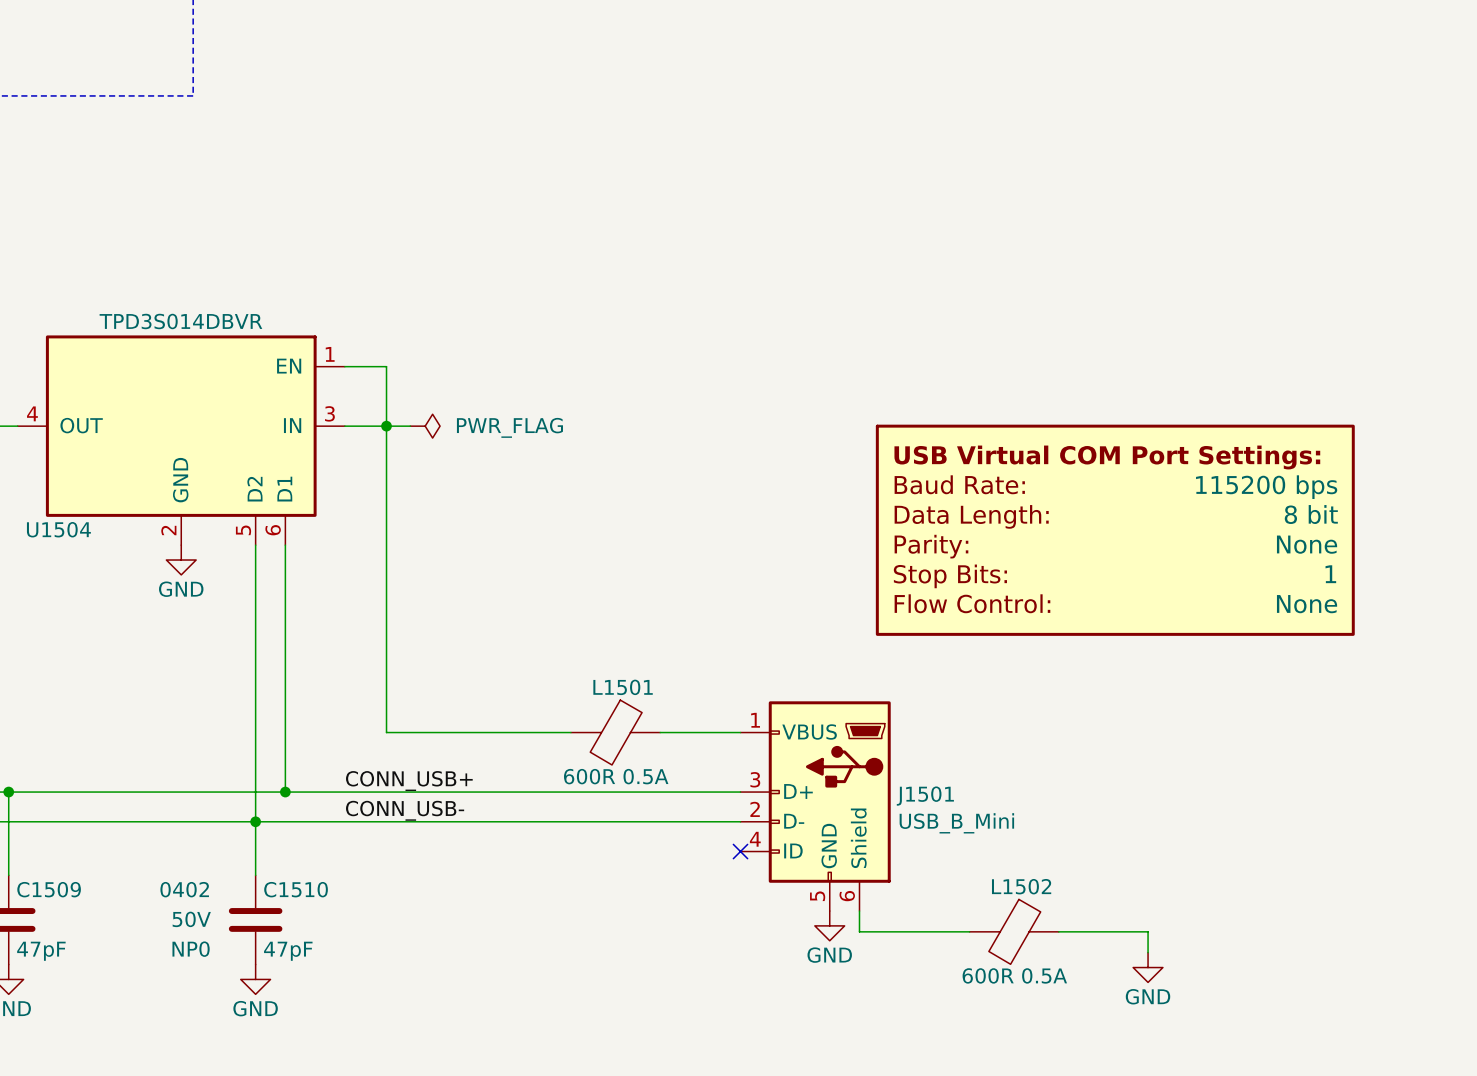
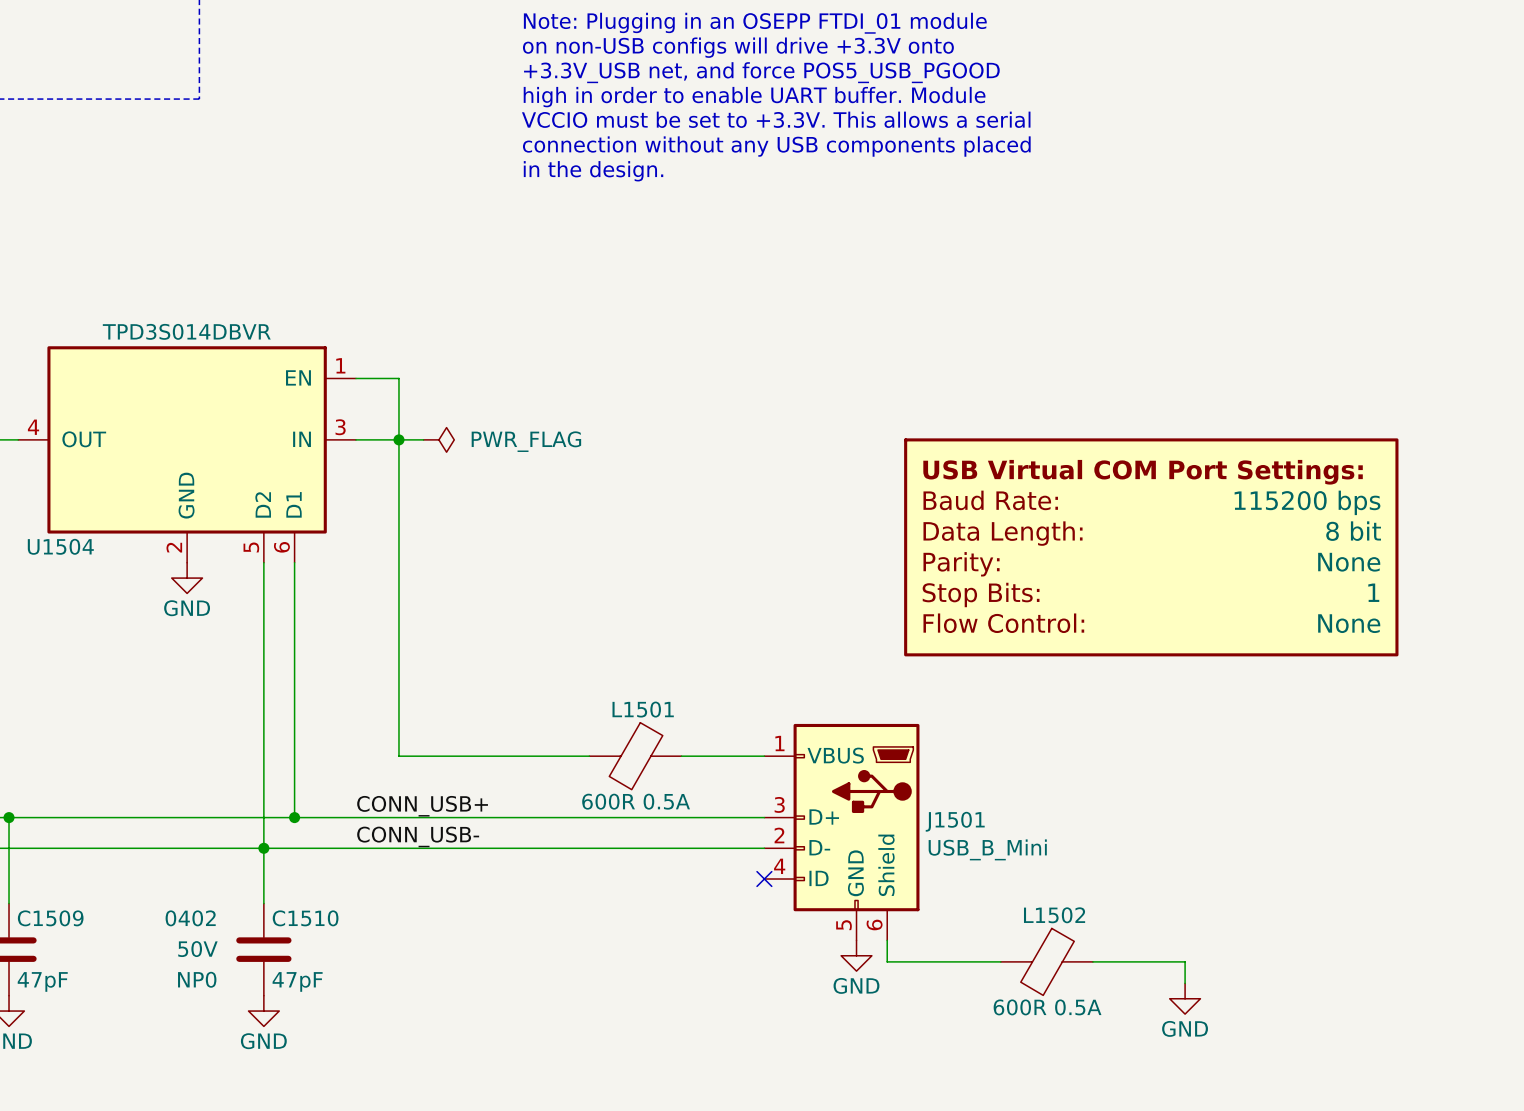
text: none -> Note: Plugging in an OSEPP FTDI_01 module (755, 23)
text: none -> on non-USB configs will drive +3.3V onto (738, 47)
text: none -> +3.3V_USB net, and force POS5_USB_PGOOD (761, 72)
text: none -> high in order to enable UART buffer. Module (754, 97)
text: none -> VCCIO must be set to +3.3V. This allows a serial (776, 119)
text: none -> connection without any USB components placed (776, 146)
text: none -> in the design. (593, 171)

